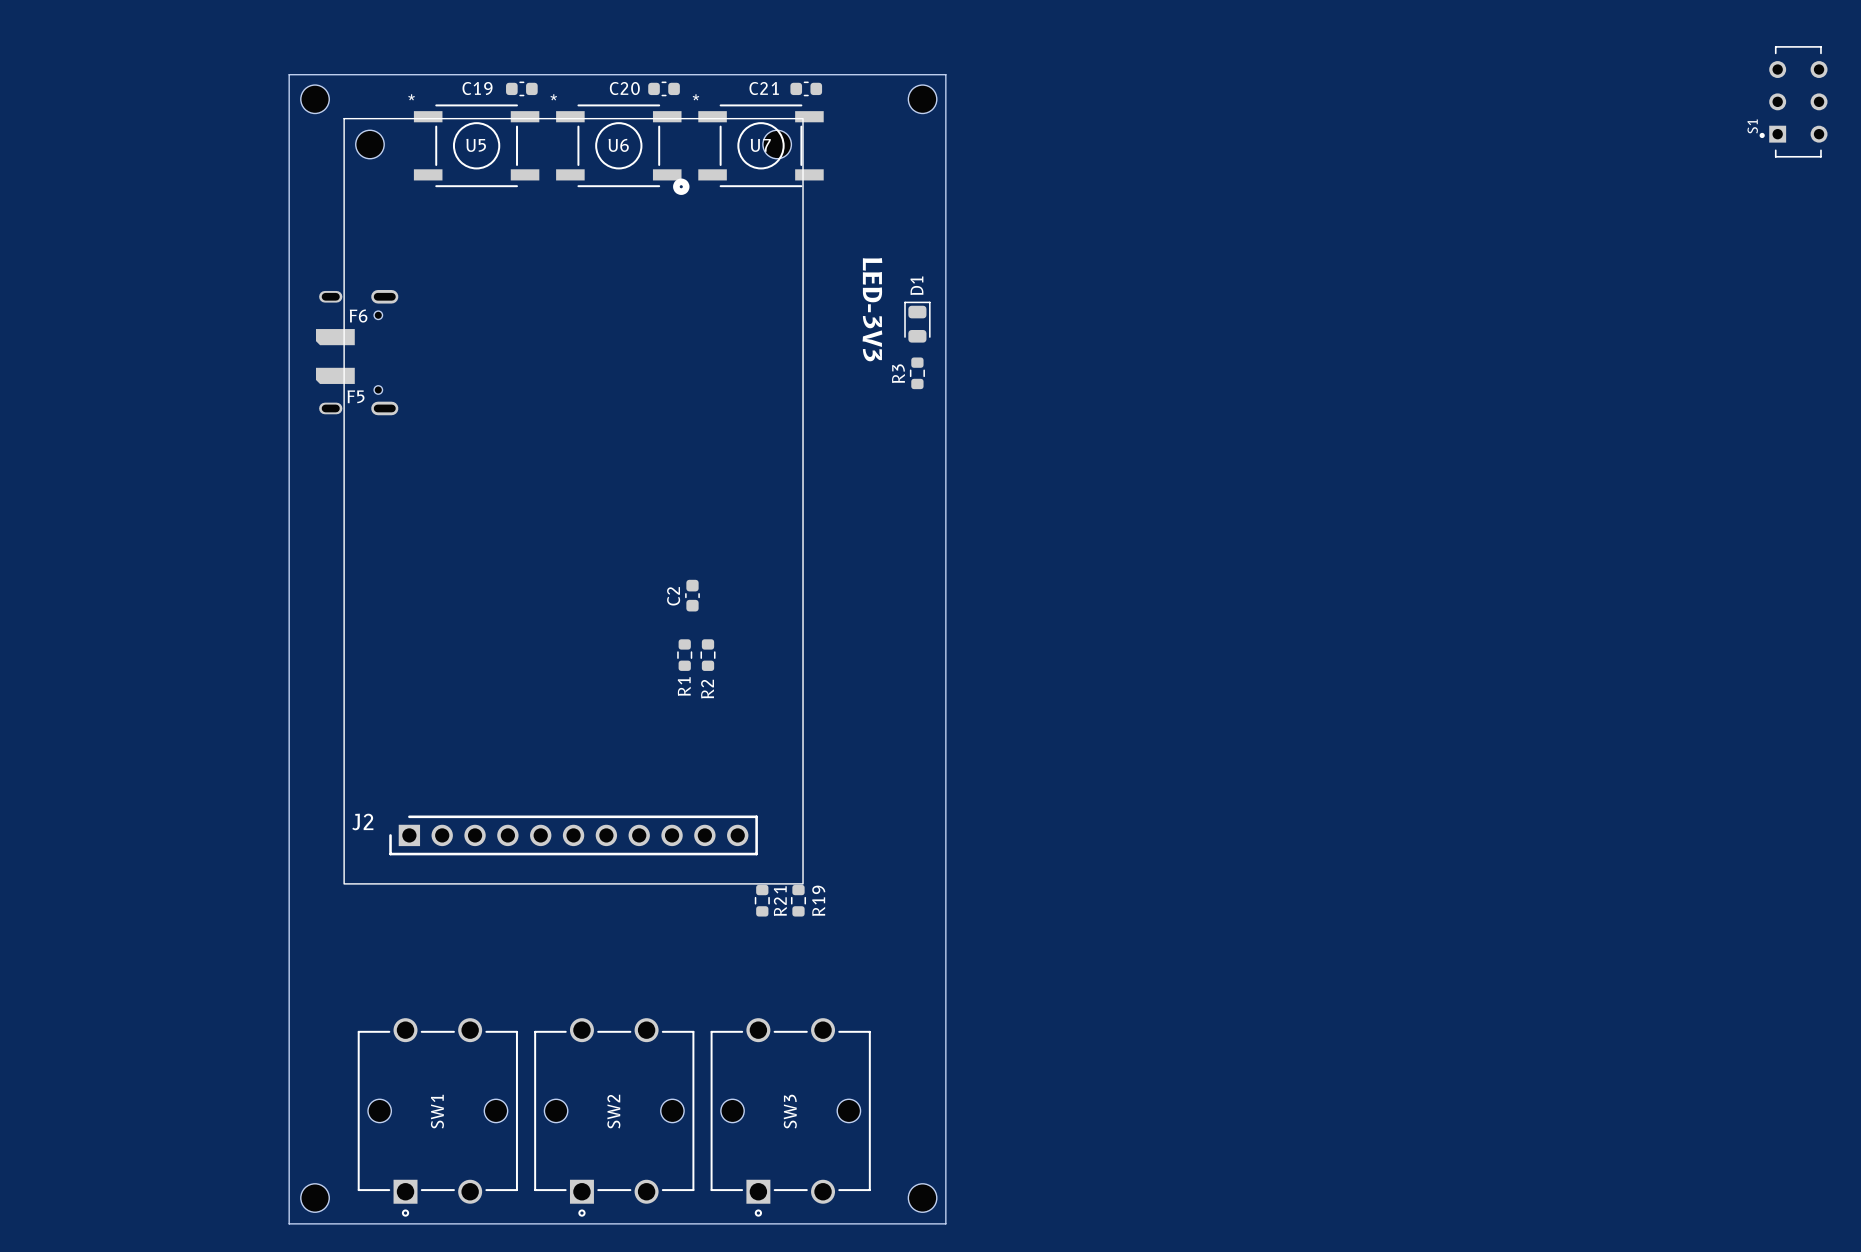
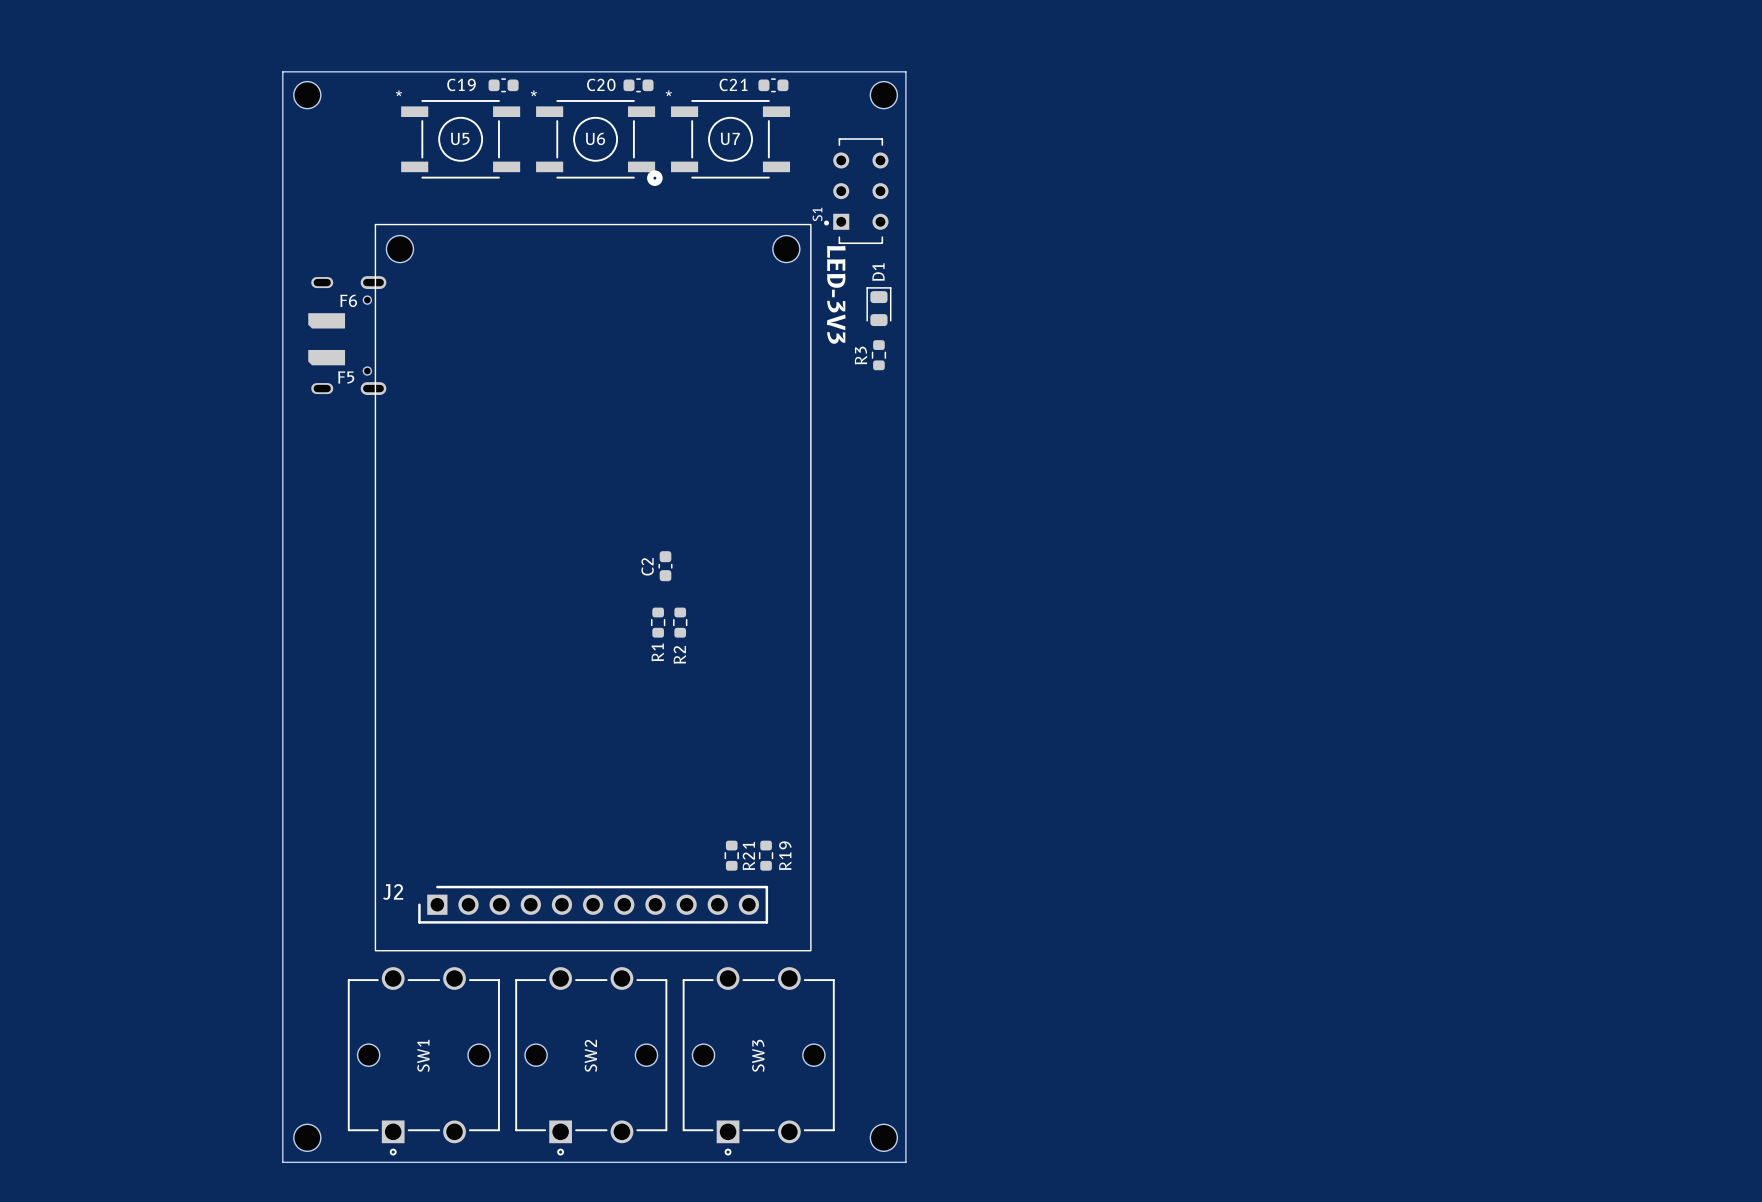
S1 position: (1793, 101) -> (856, 191)
J2 position: (573, 501) -> (593, 587)

